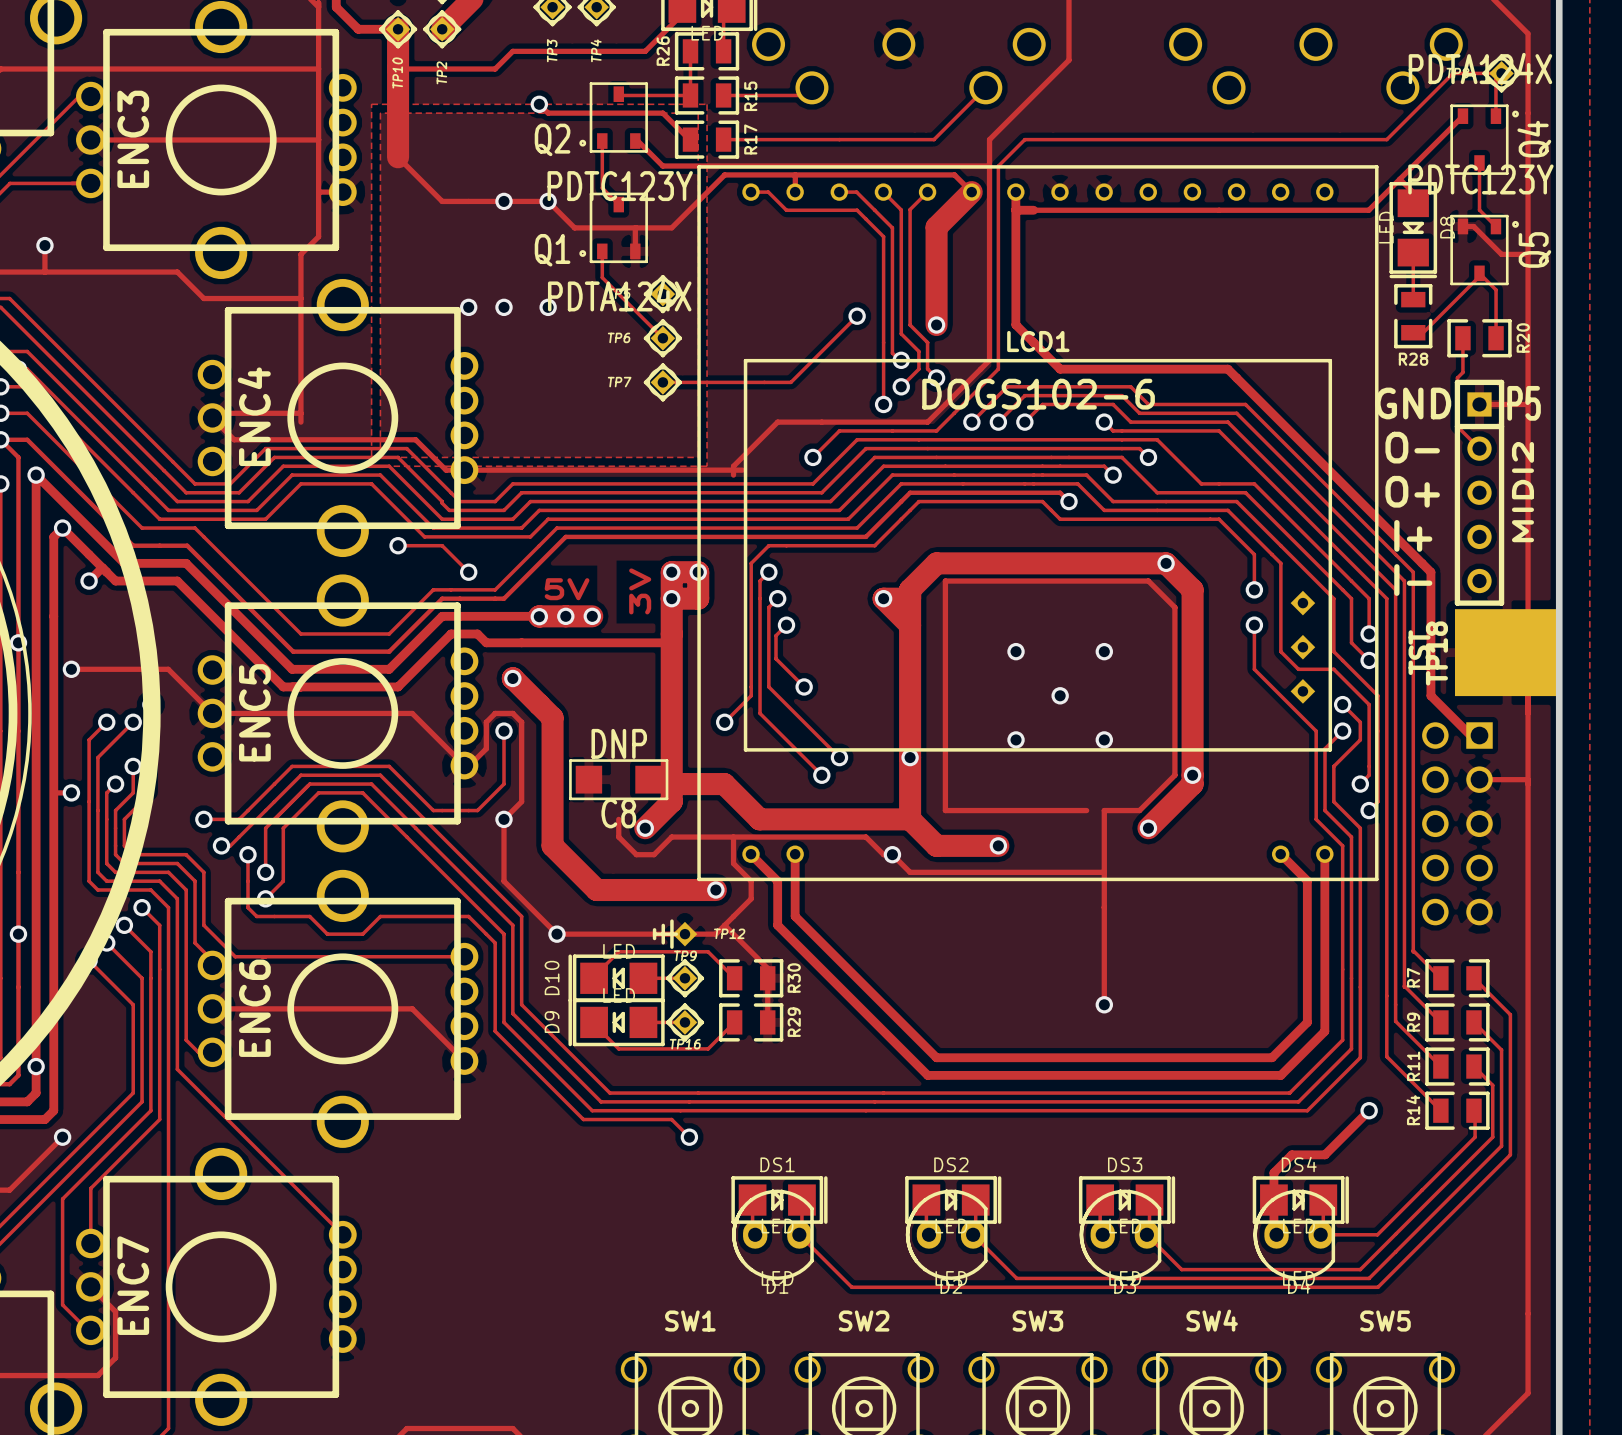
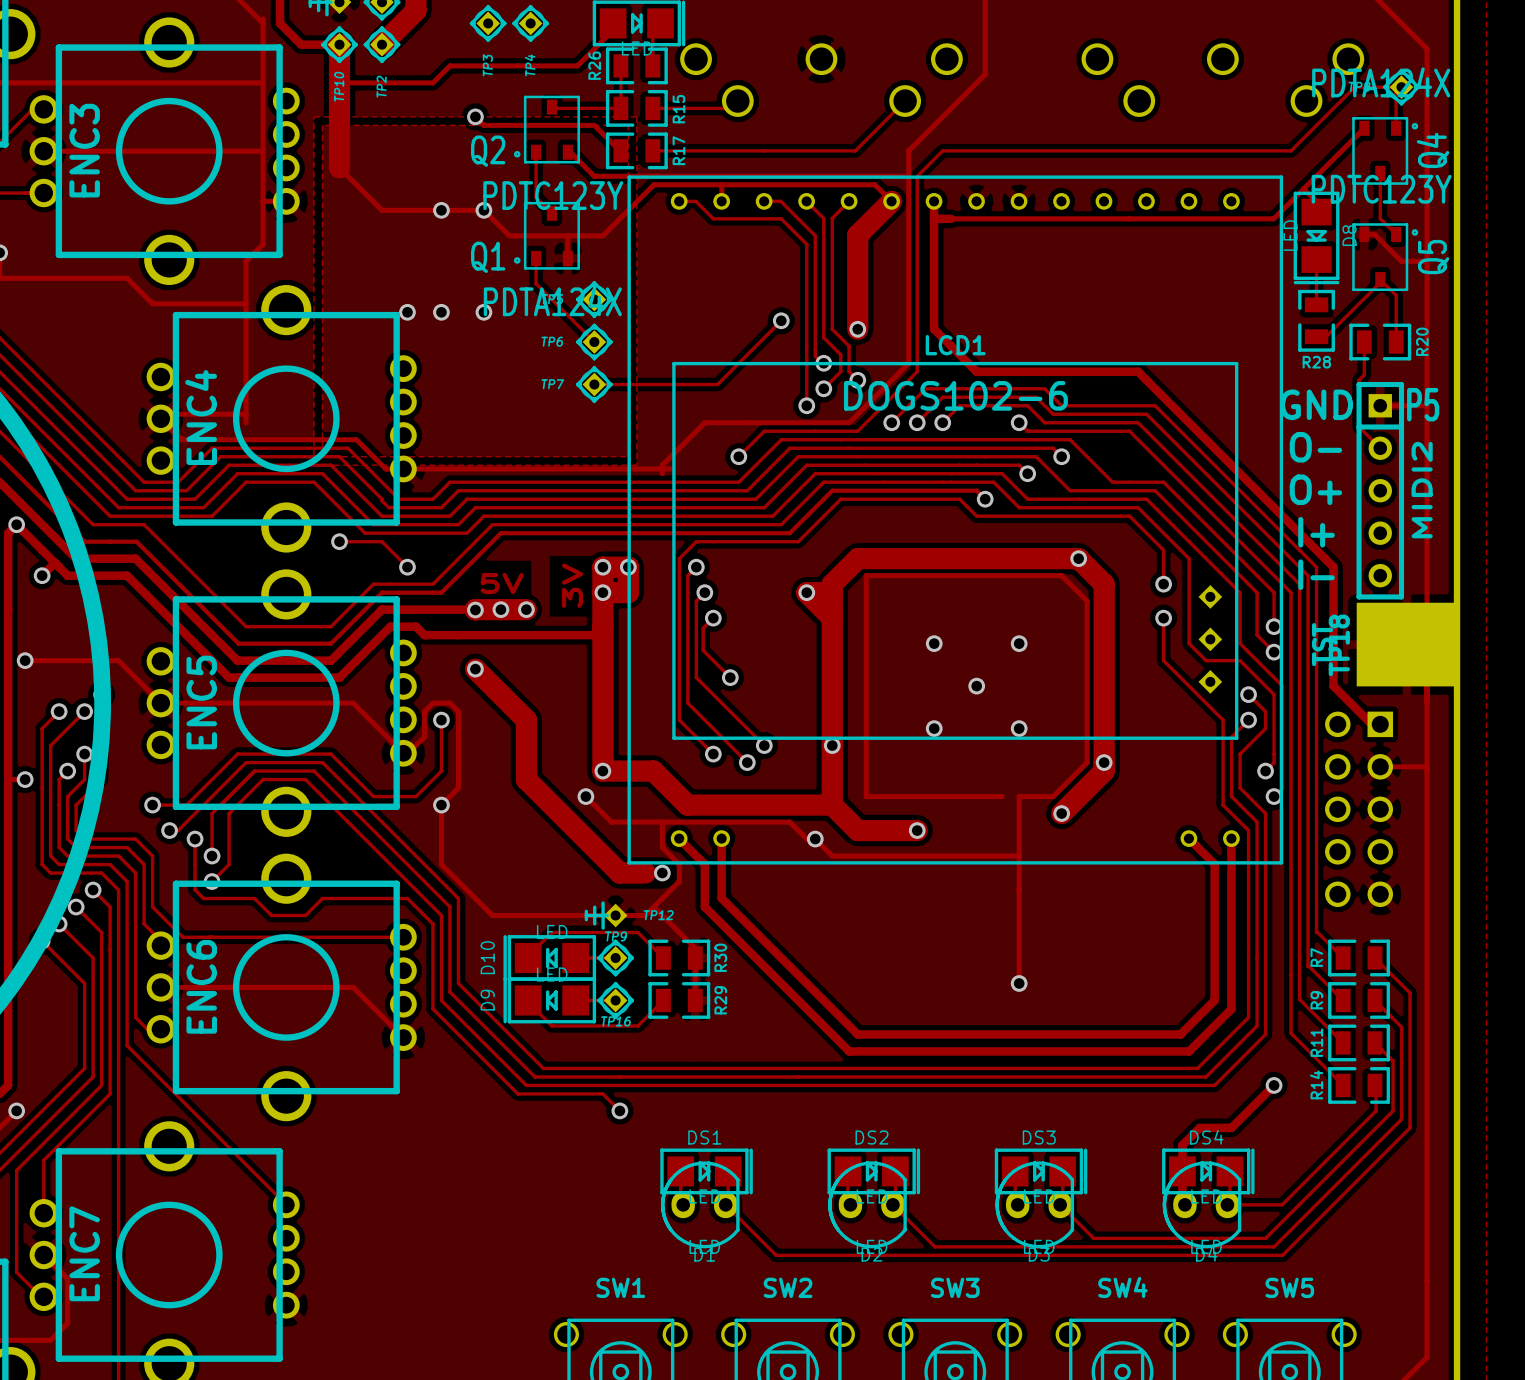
track: (512, 678) (552, 717) (552, 845) (596, 890) (689, 890) -> (475, 669) (526, 720) (526, 779) (619, 873)
via position: (512, 678) -> (475, 669)
track: (751, 695) (724, 722) -> (679, 686) (679, 720) (713, 754)
via: (724, 722) -> none
via: none -> (713, 754)
C8: DNP (618, 779) -> none
track: (671, 784) (671, 801) (645, 828) -> none
via: none -> (602, 771)
track: (618, 819) (618, 837) (636, 854) (654, 854) (671, 837) (680, 837) -> (585, 796) (611, 822)
via position: (645, 828) -> (585, 796)
via position: (715, 890) -> (662, 873)
via: (556, 934) -> none

